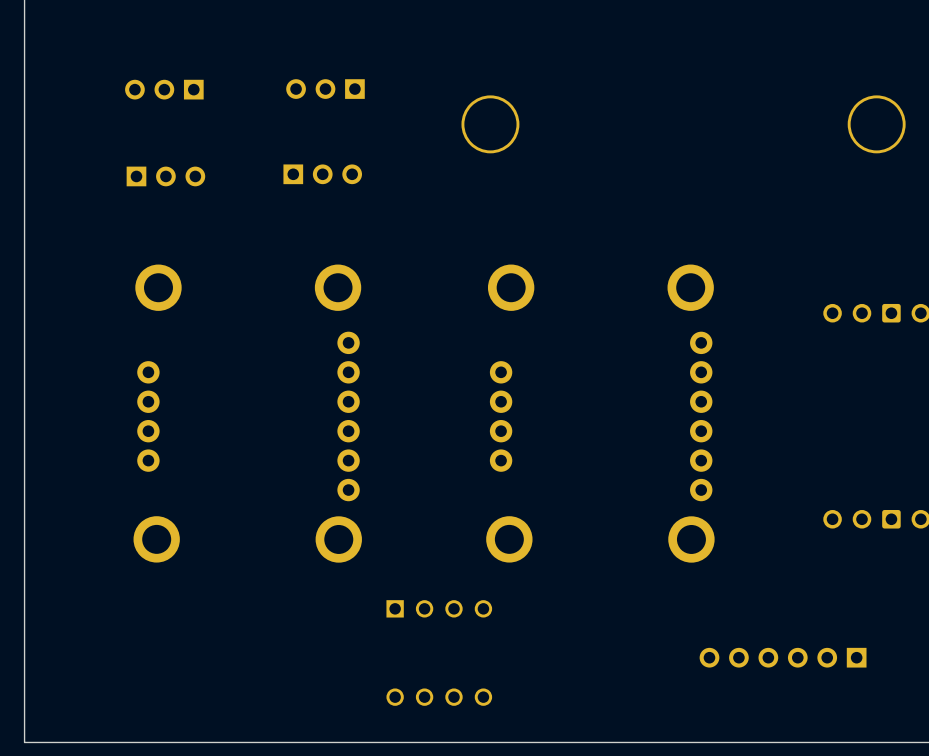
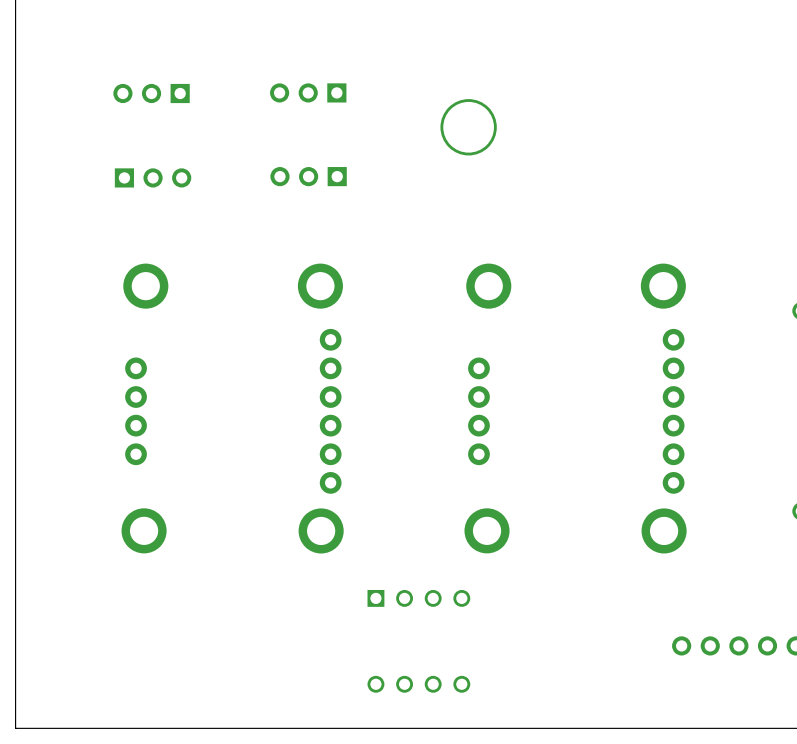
part rotation: 0° (322, 174) -> 180° (308, 176)

